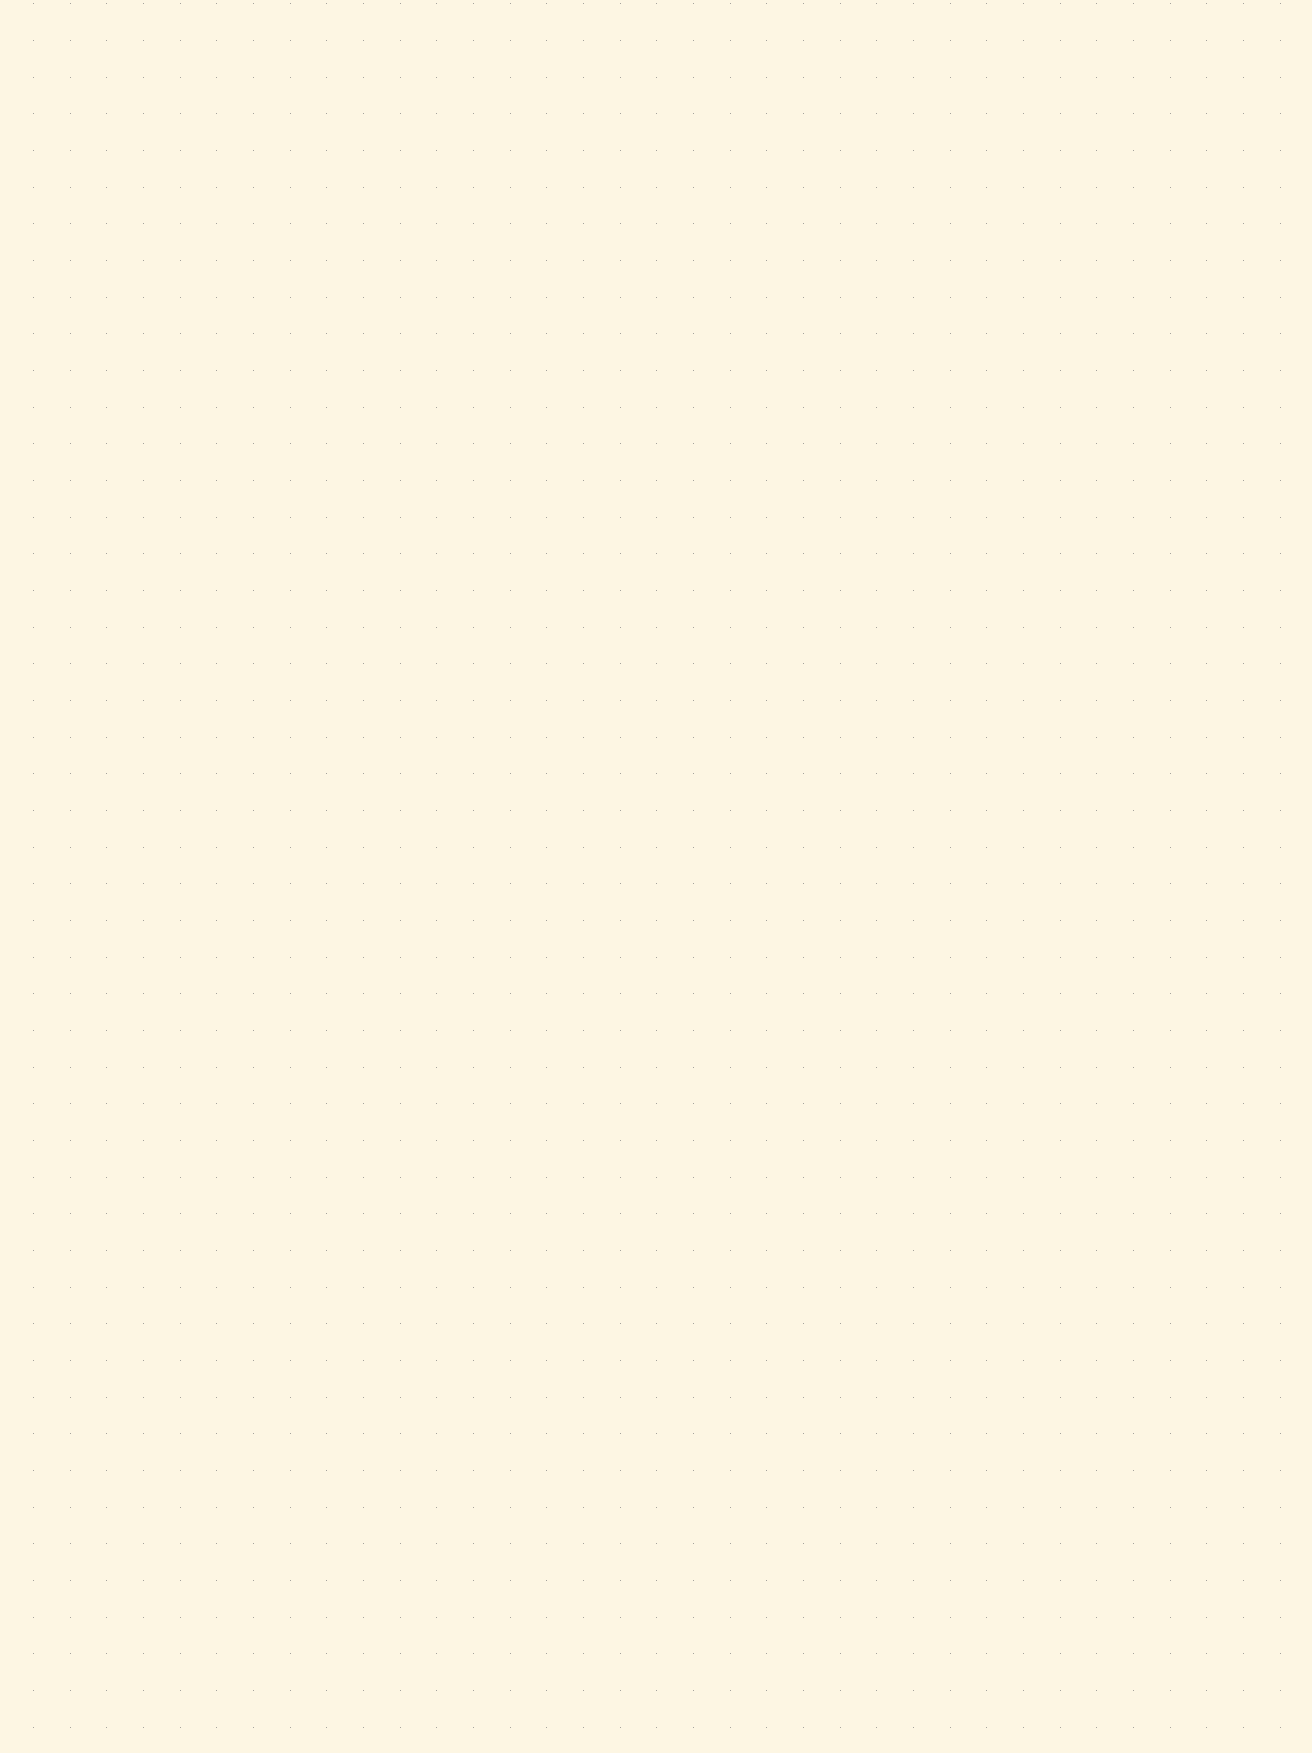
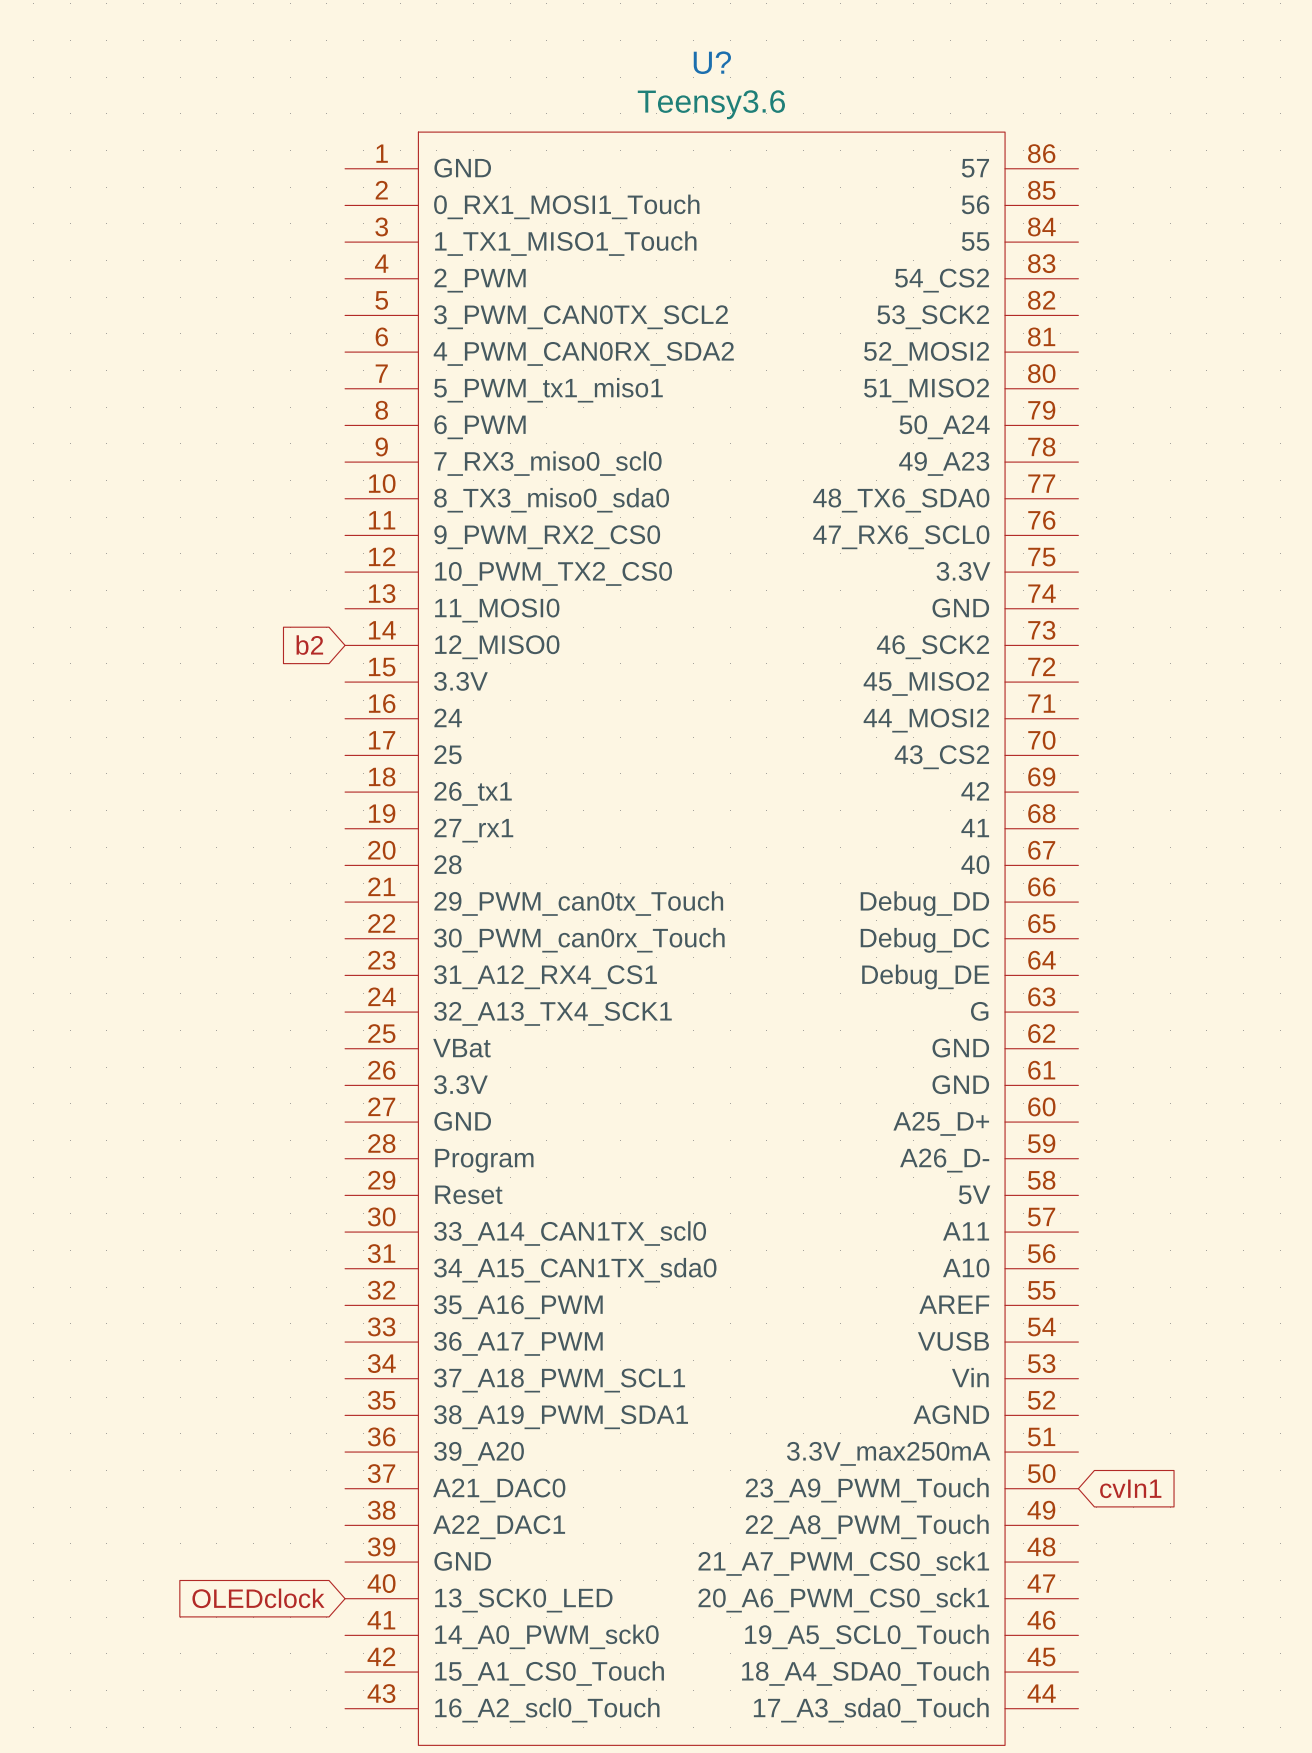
global label: none -> b2 (309, 645)
U?: none -> Teensy3.6 (711, 938)
global label: none -> cvIn1 (1130, 1488)
global label: none -> OLEDclock (258, 1598)

